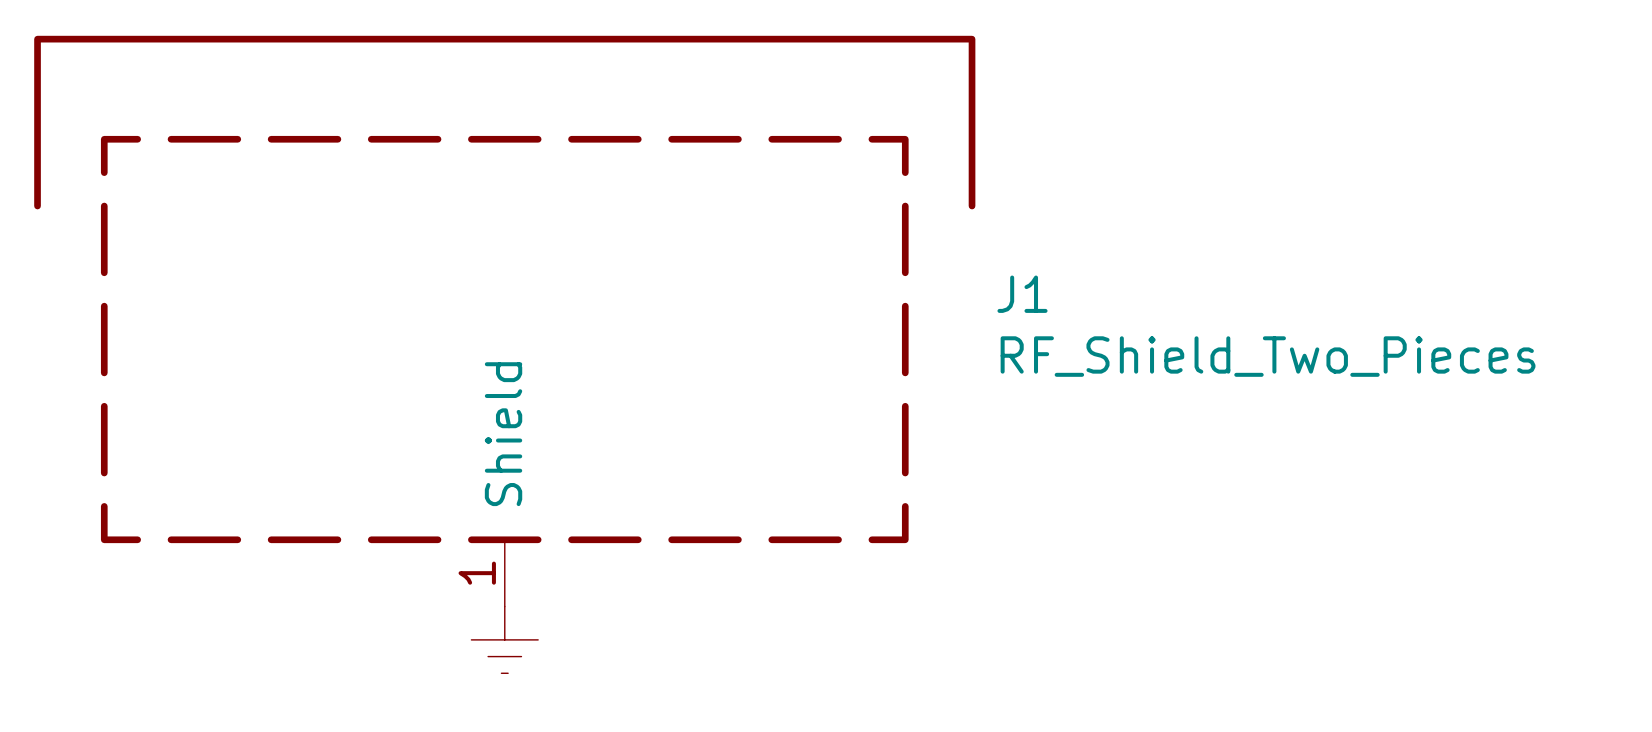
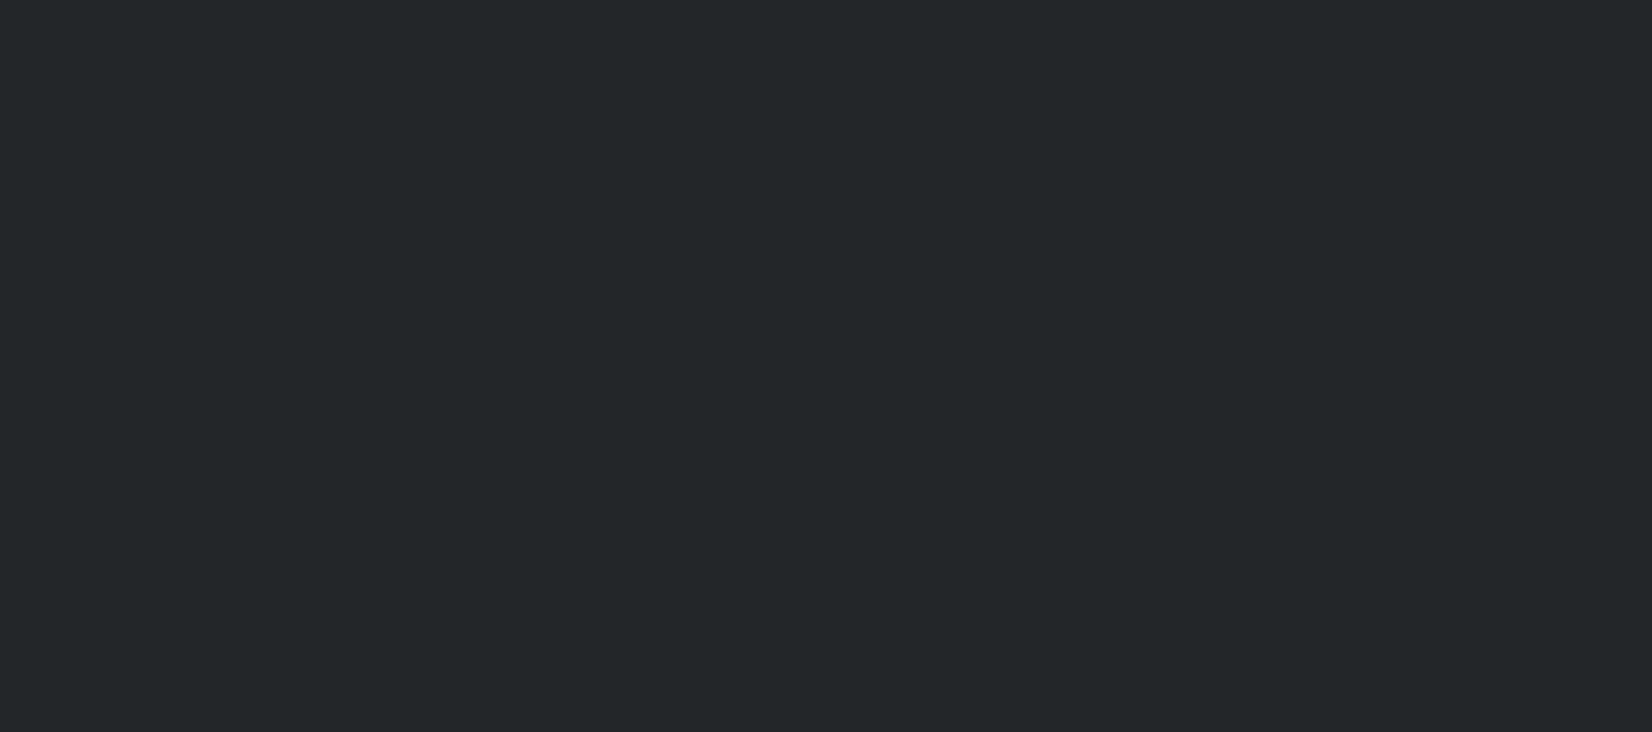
J1: RF_Shield_Two_Pieces (504, 321) -> none
power symbol: (504, 639) -> none

